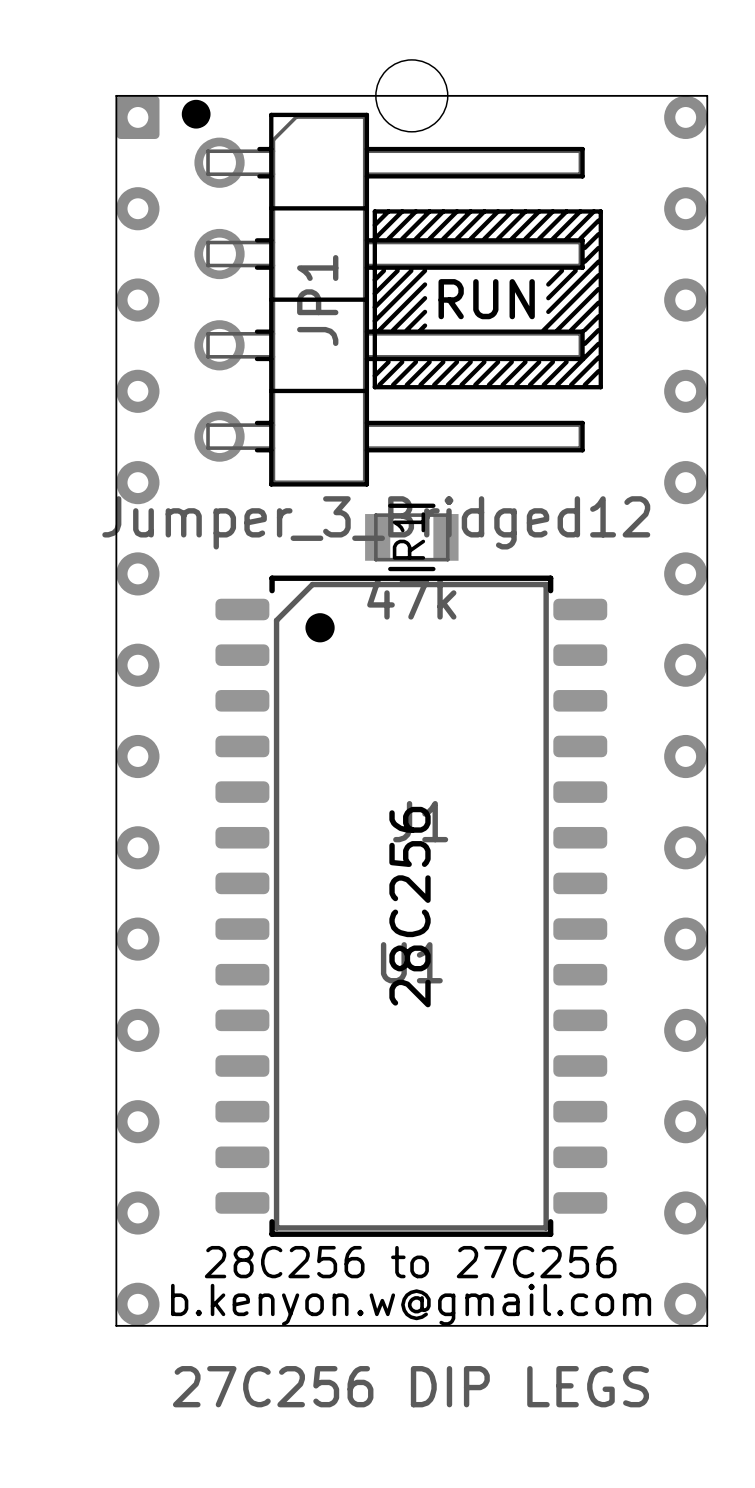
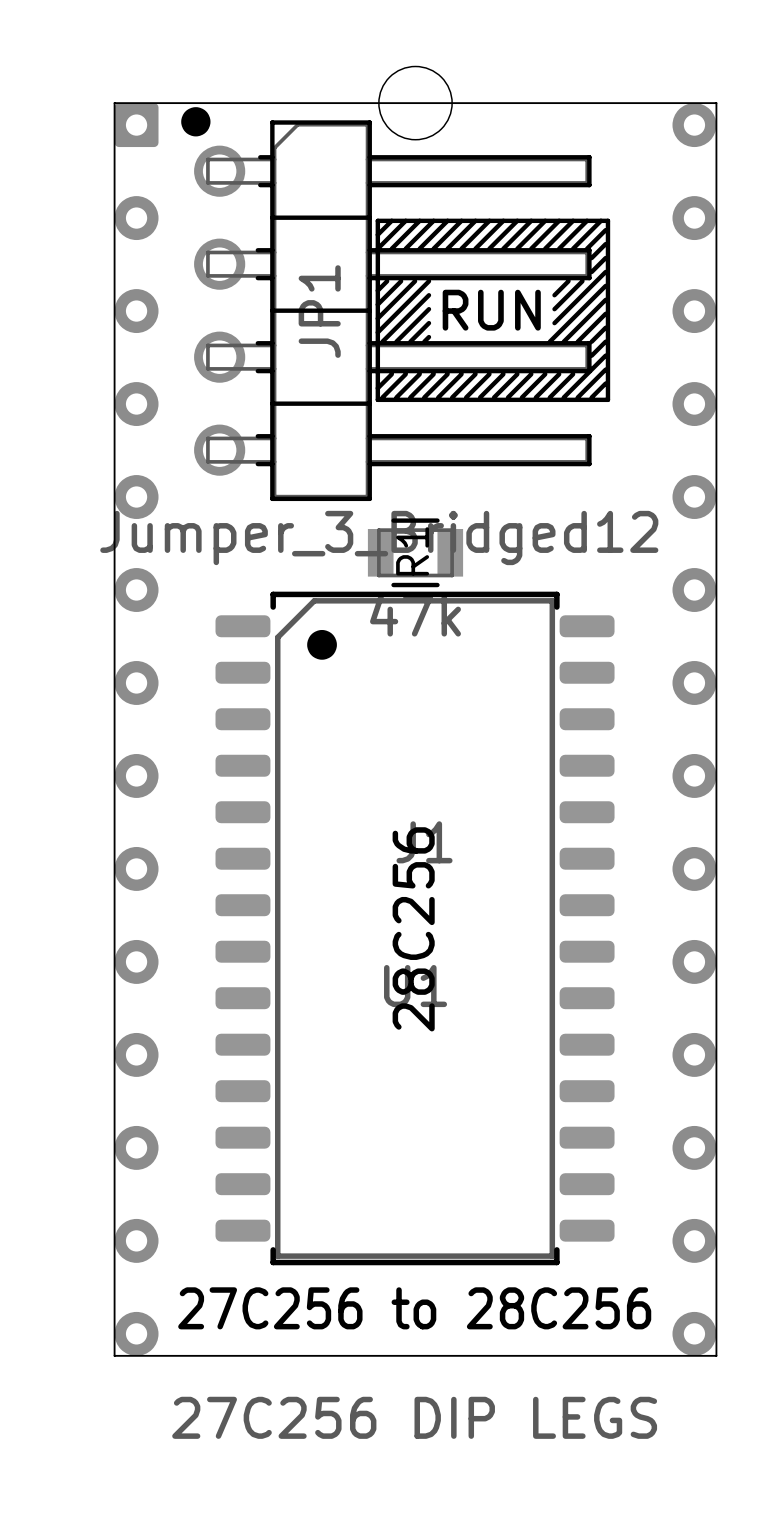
text: 28C256 to 27C256 (410, 1262) -> 27C256 to 28C256 (414, 1308)
text: b.kenyon.w@gmail.com (411, 1304) -> none

